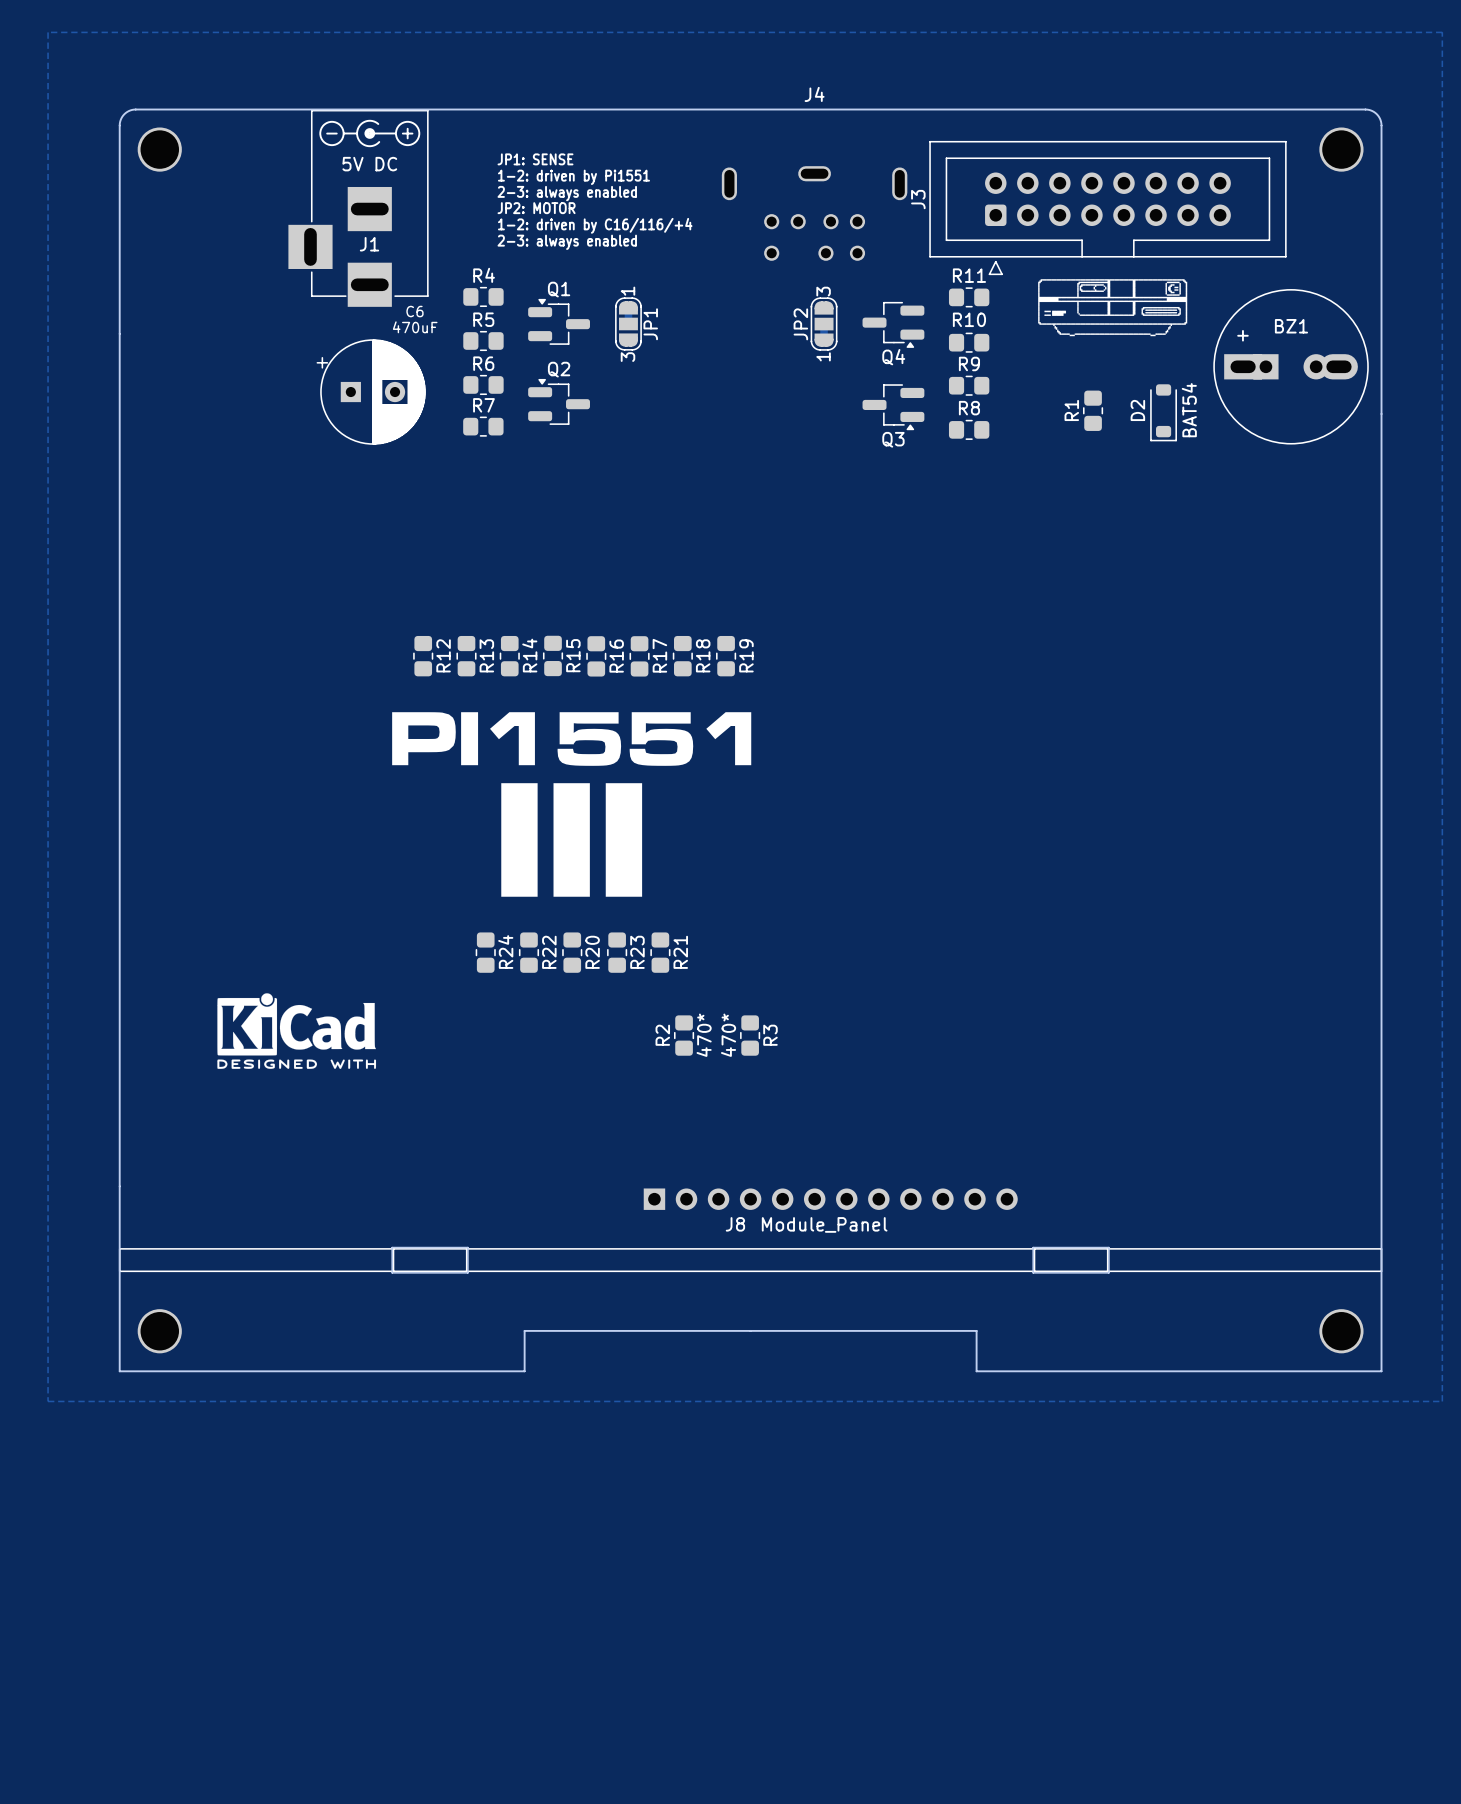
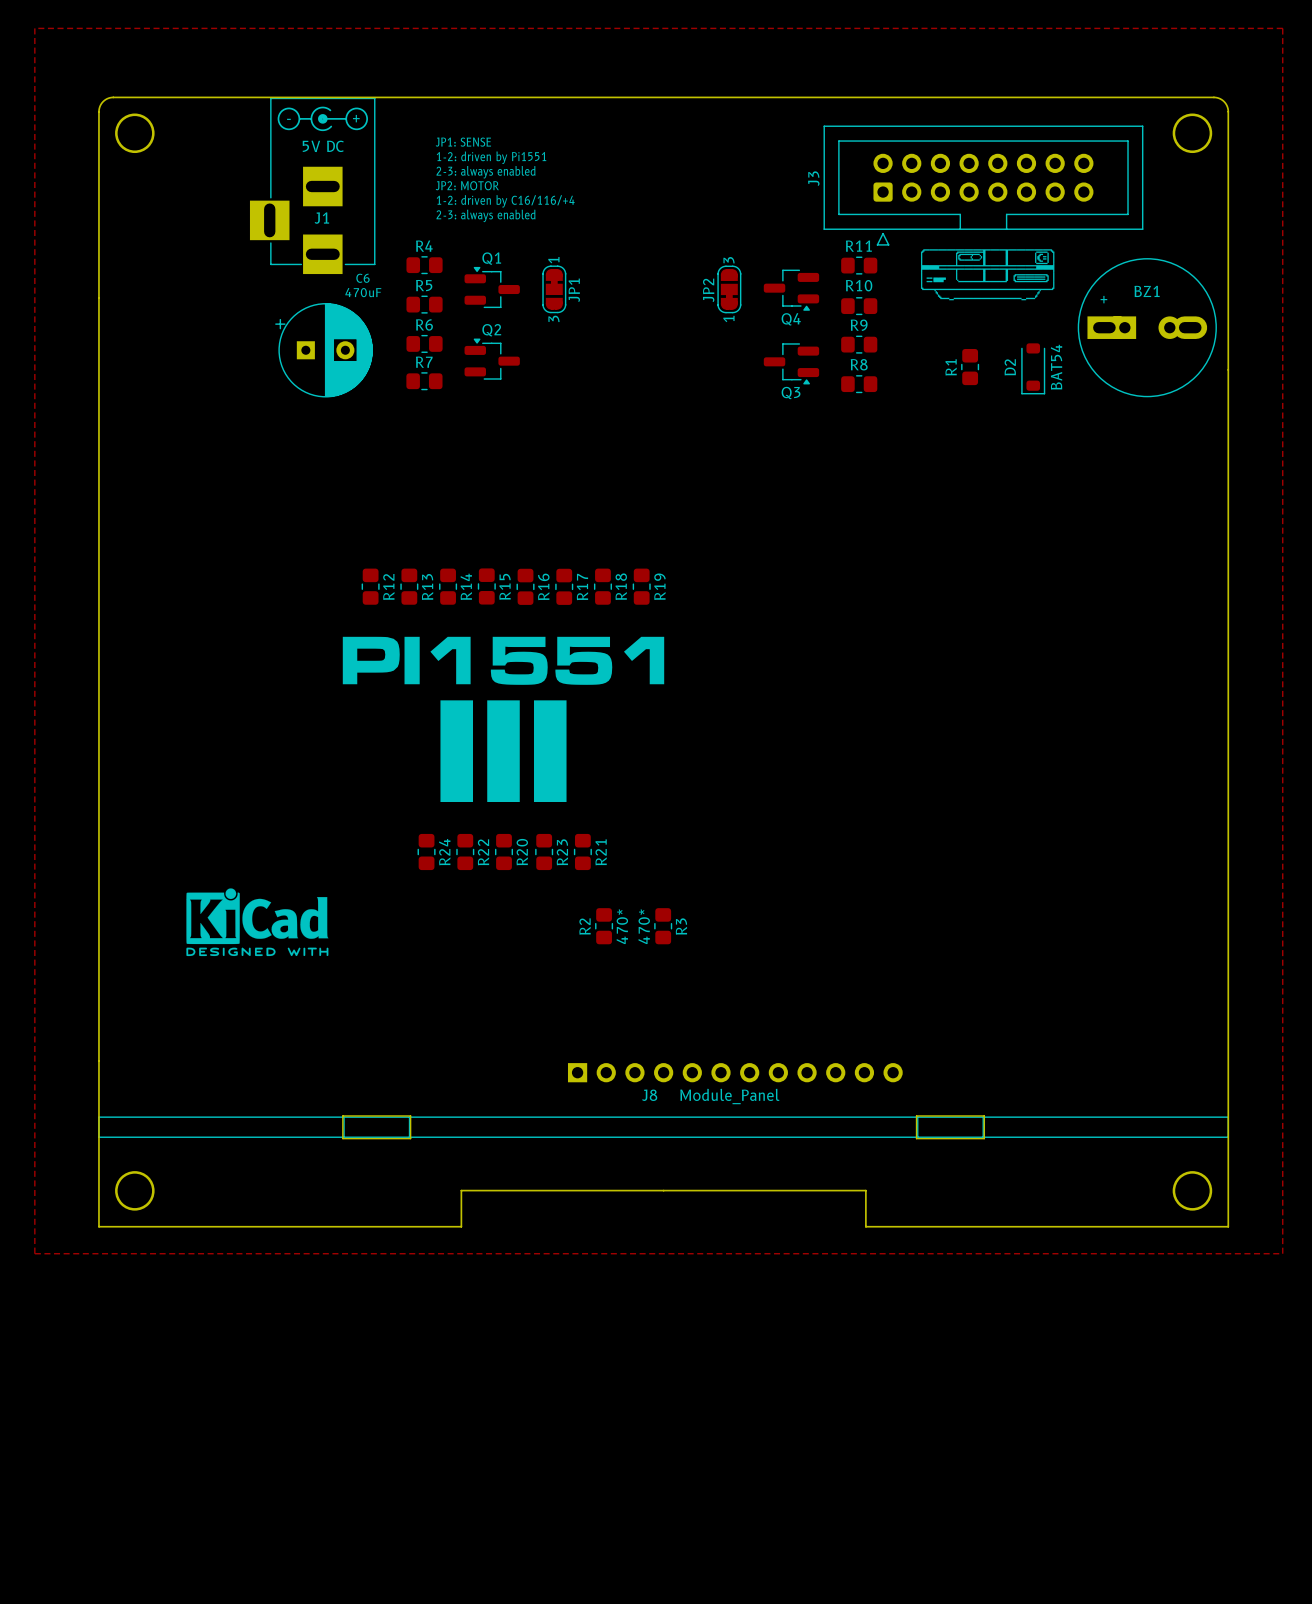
J4: (814, 213) -> none

